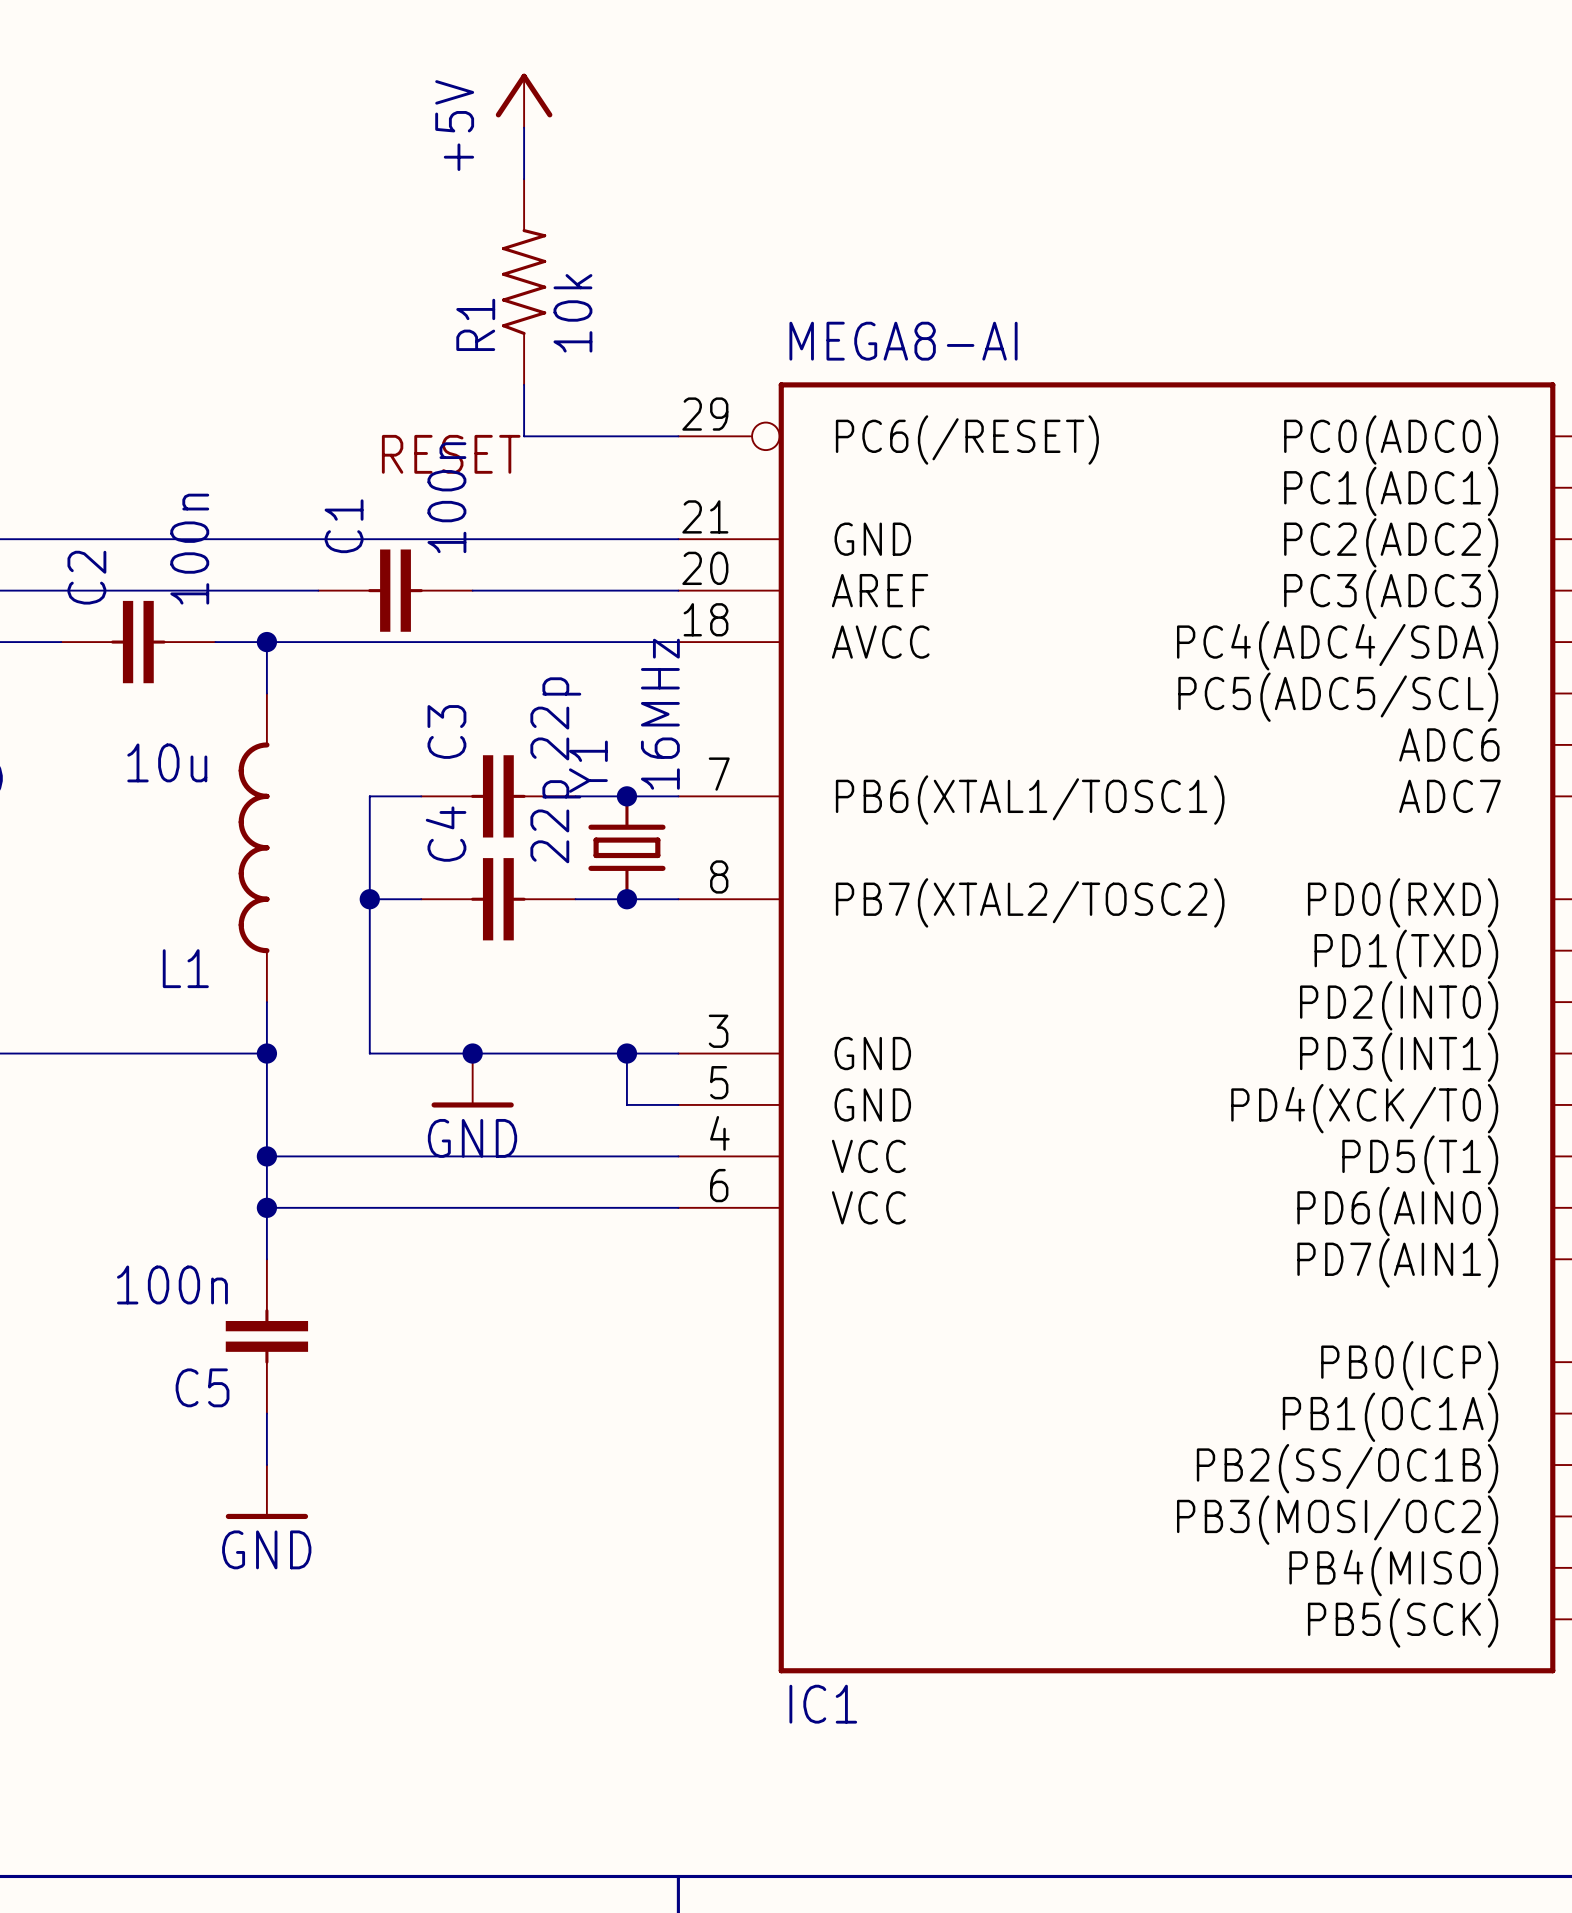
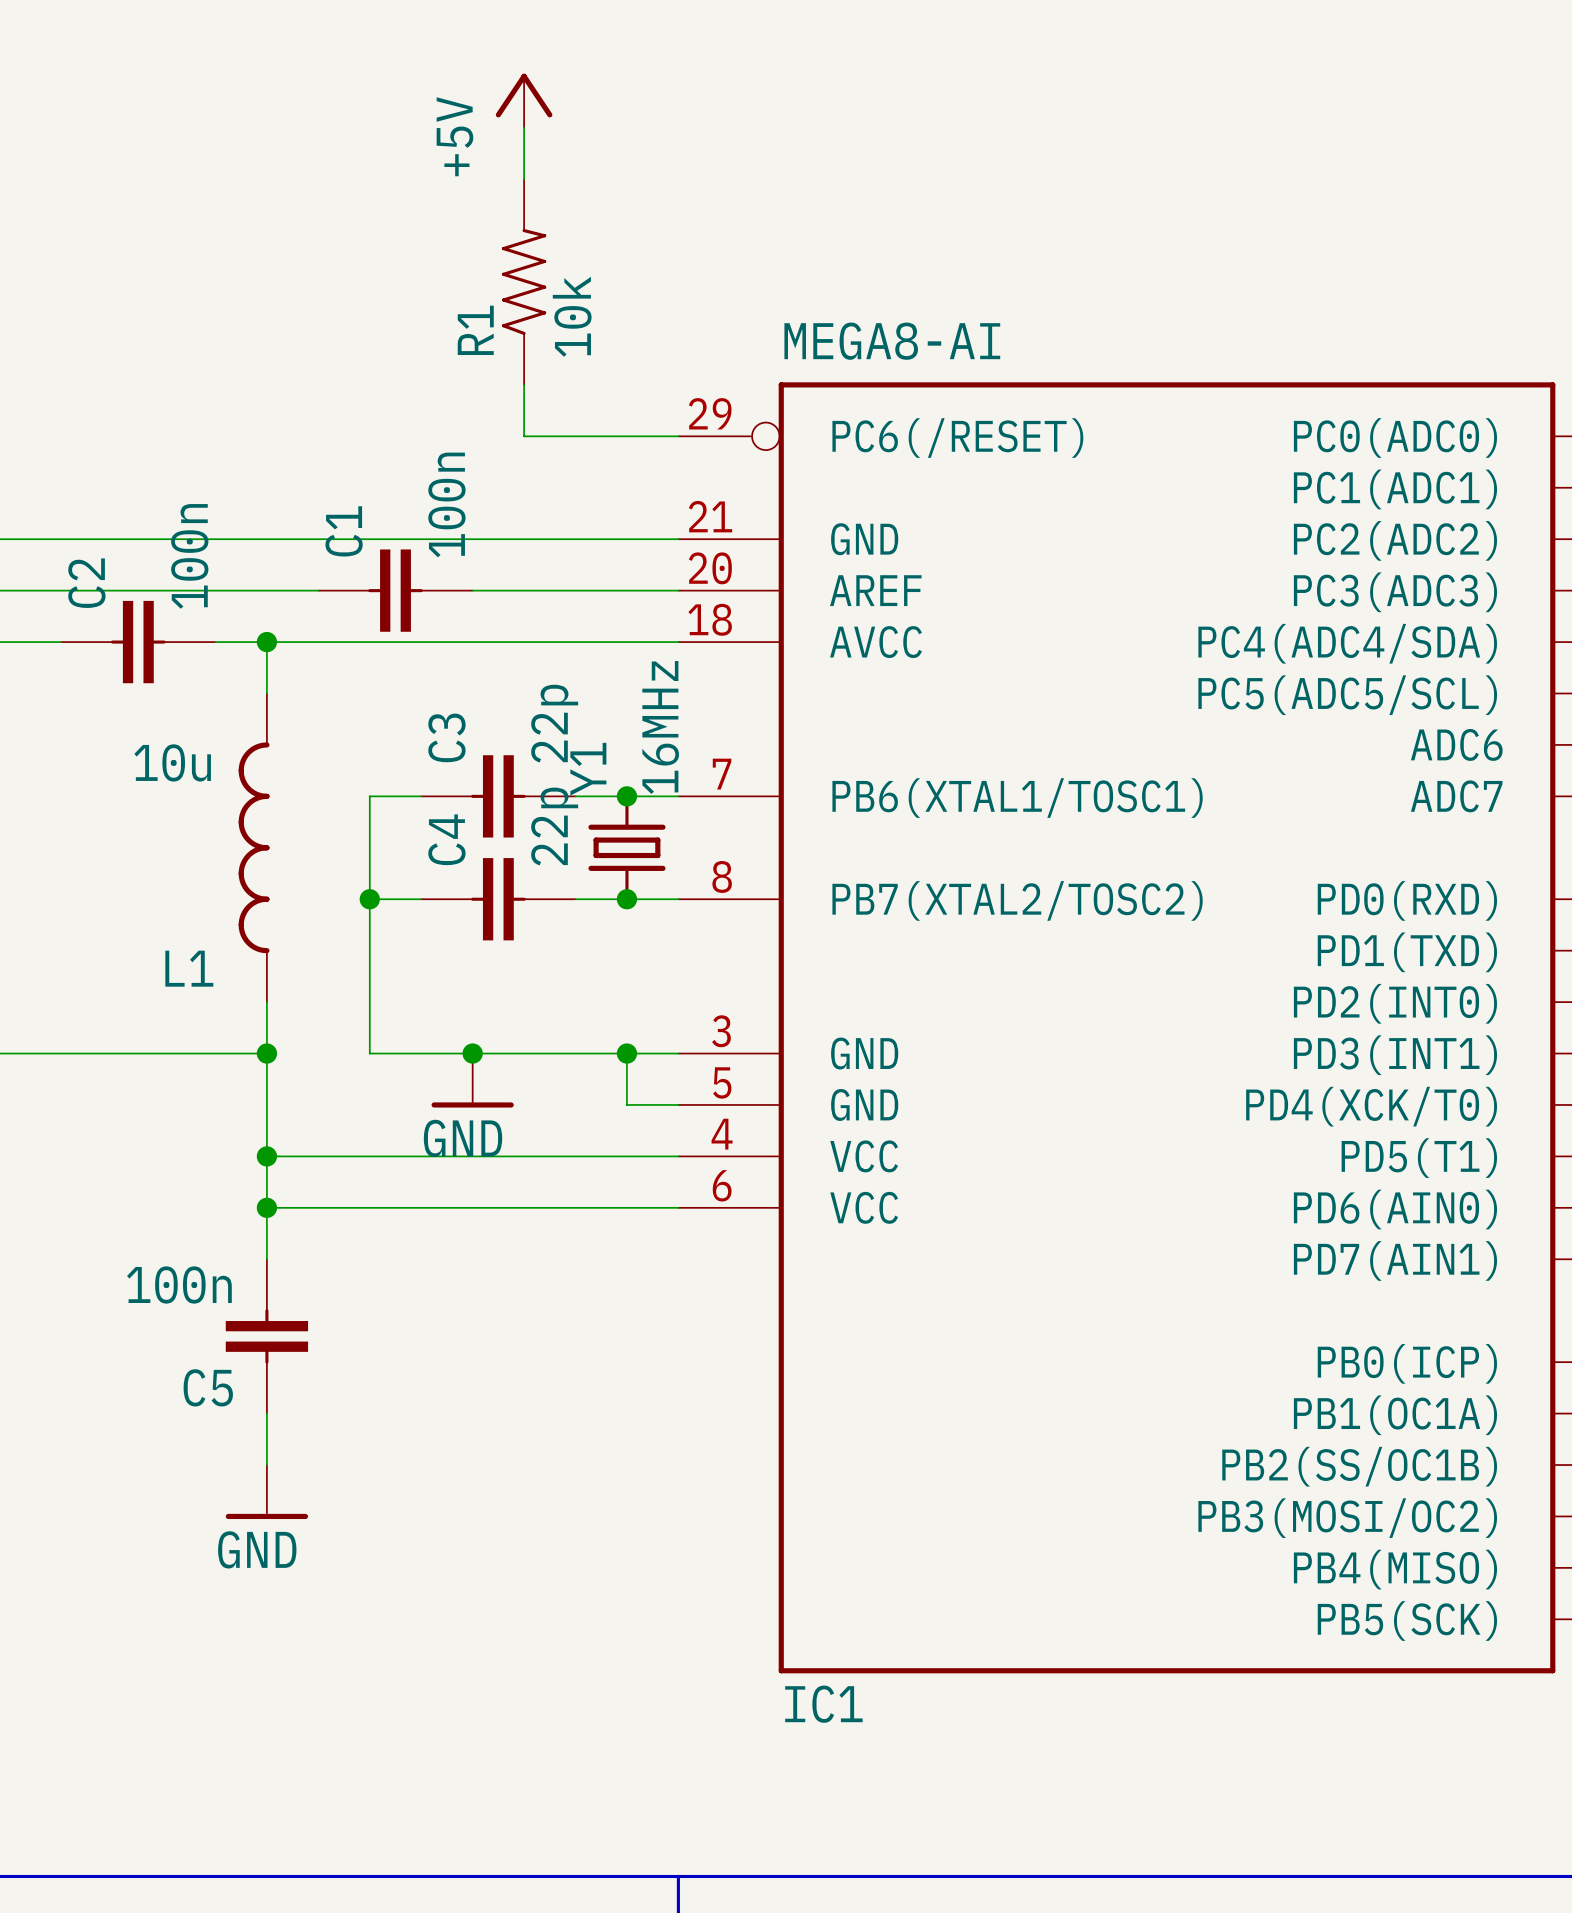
label: RESET (451, 454) -> none

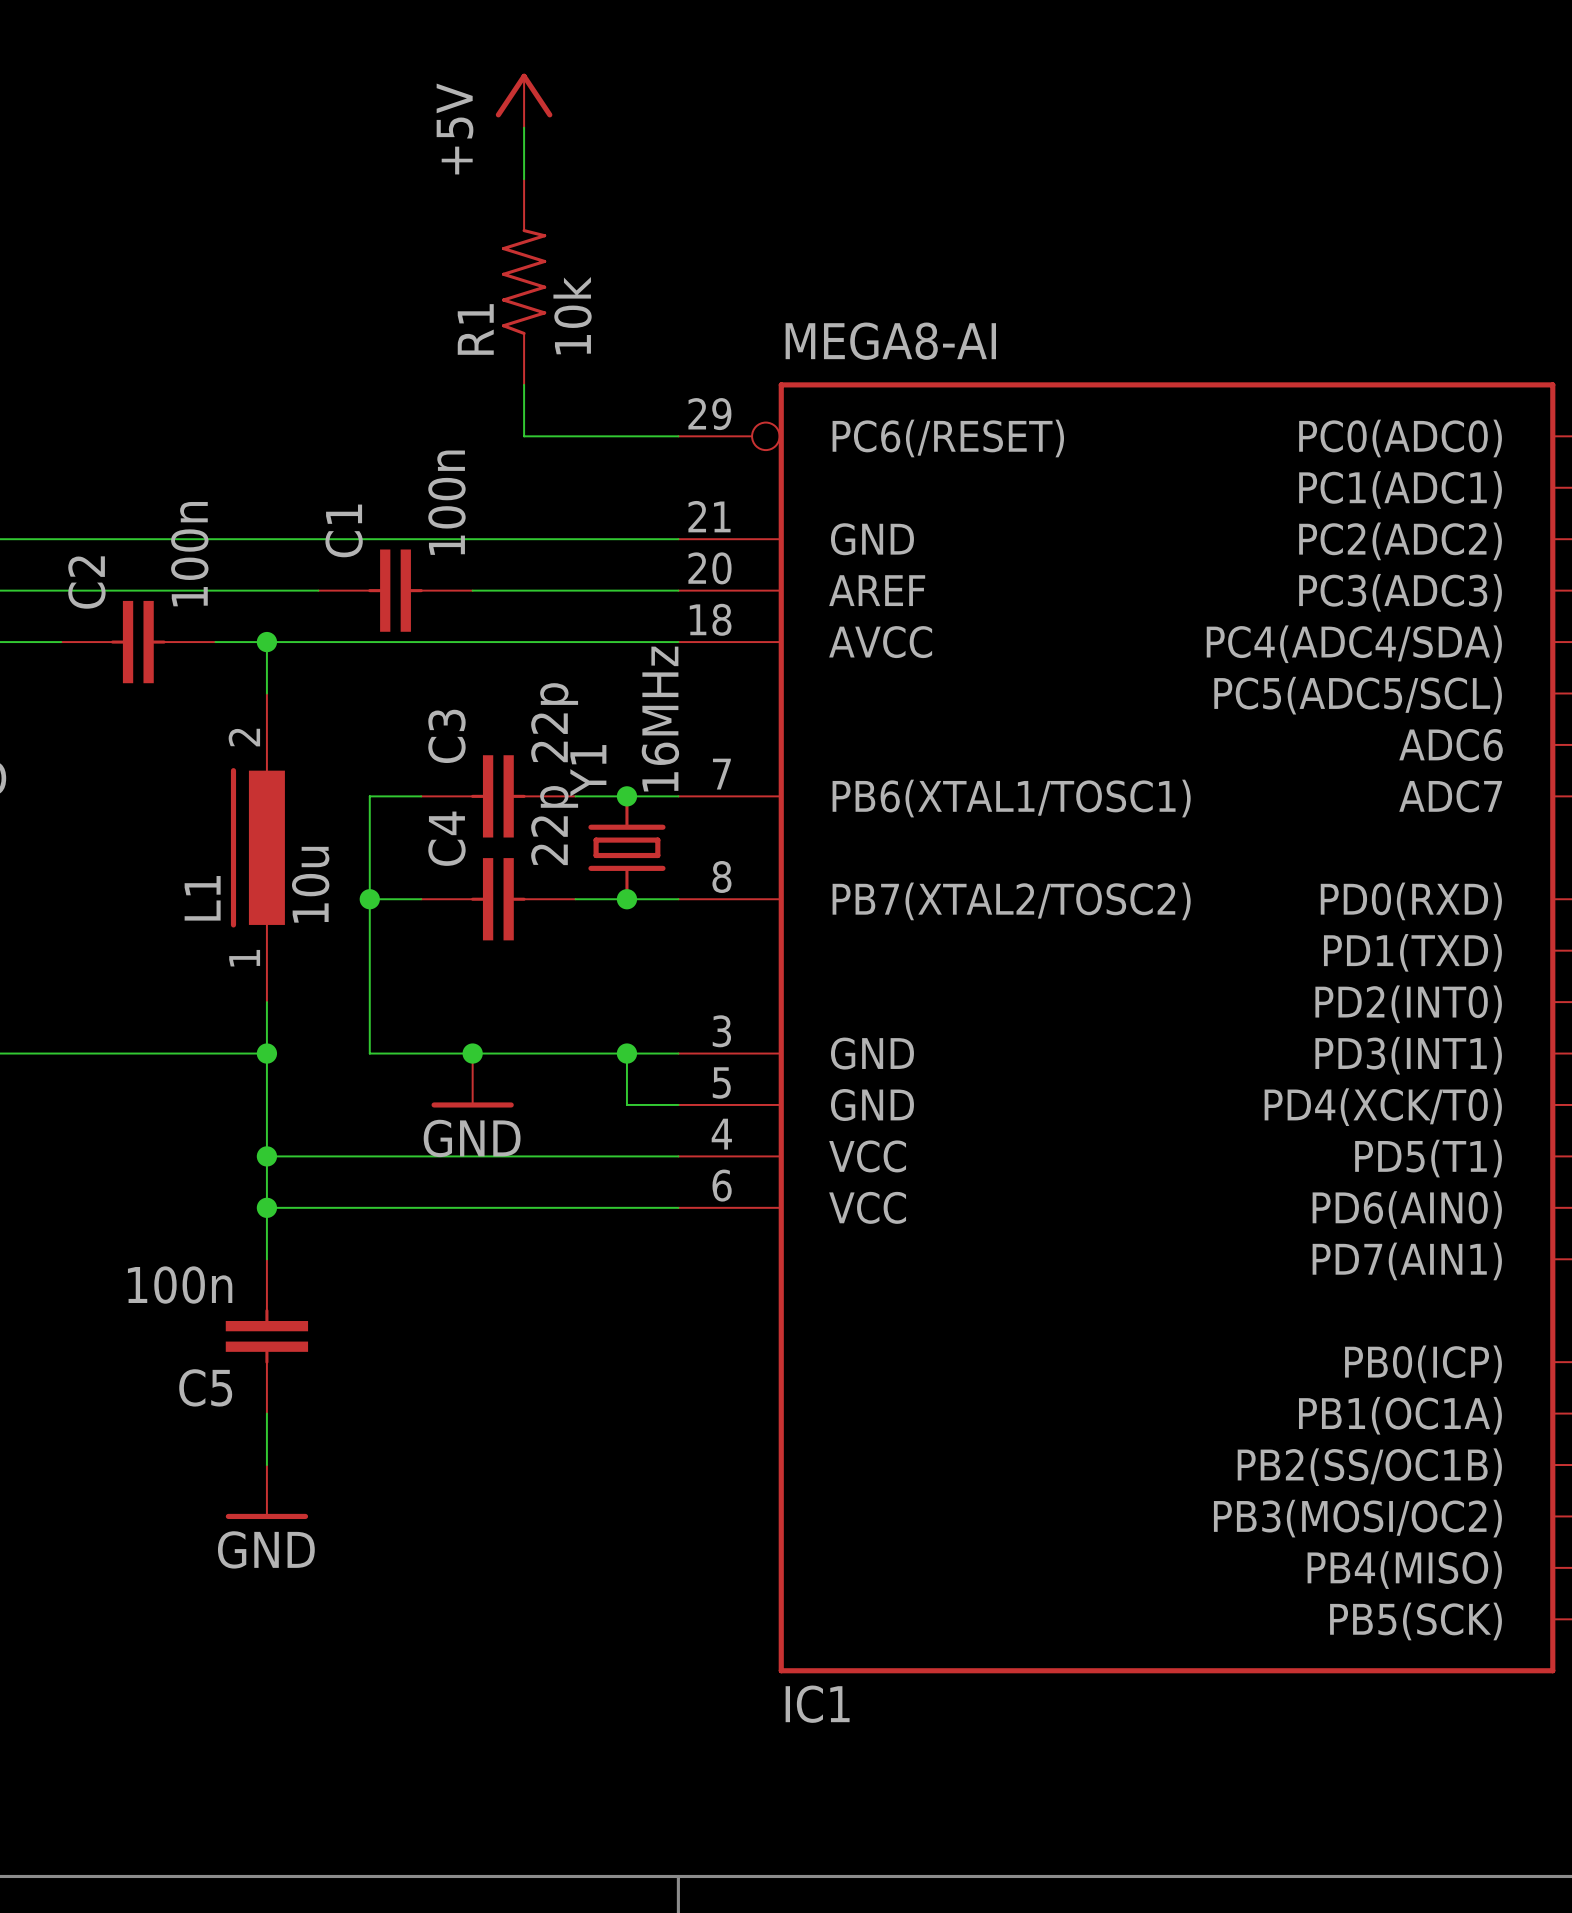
L1 symbol: [238, 693, 270, 1003] -> [230, 693, 285, 1003]
L1 value position: 10u (172, 762) -> 10u (310, 884)
L1 name position: L1 (189, 968) -> L1 (202, 898)

